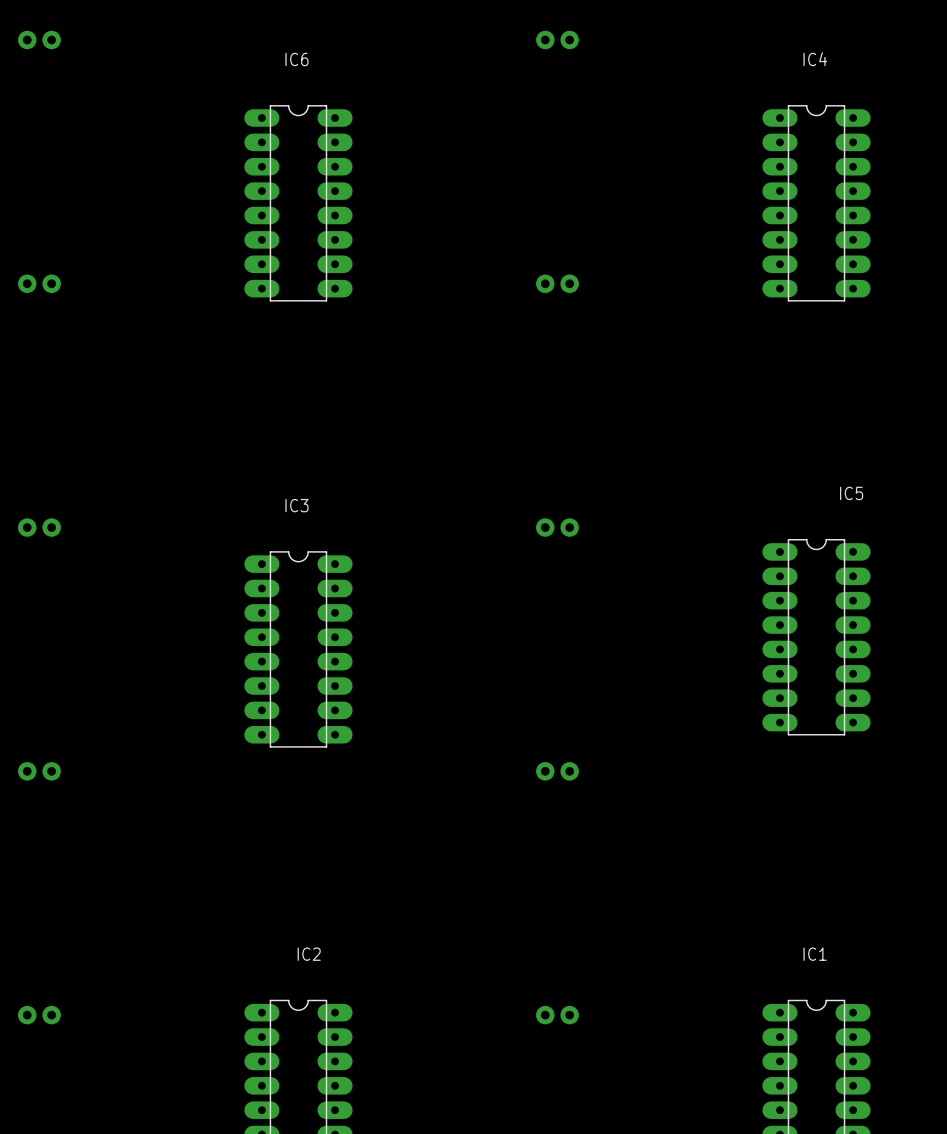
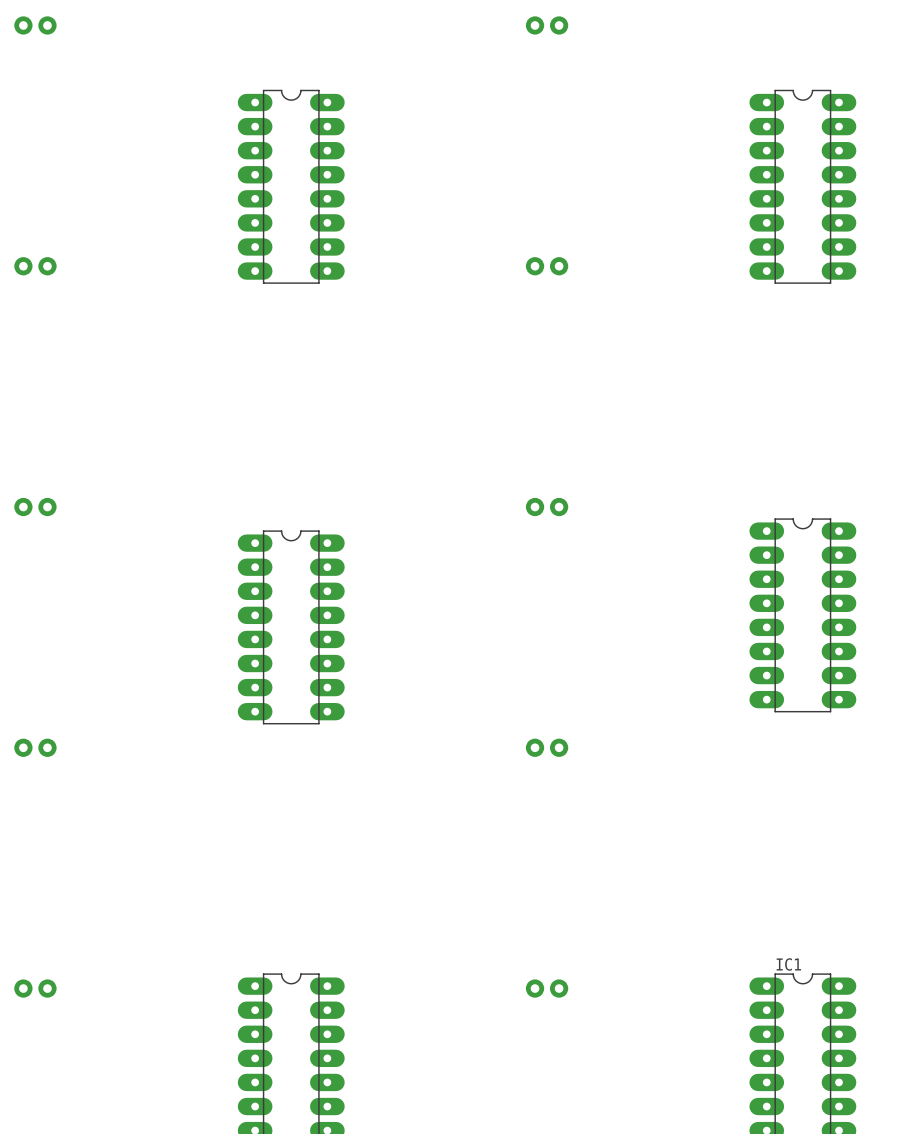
IC6 name: IC6 (296, 59) -> none
IC4 name: IC4 (815, 59) -> none
IC5 name: IC5 (851, 493) -> none
IC3 name: IC3 (296, 505) -> none
IC2 name: IC2 (309, 954) -> none
IC1 name position: IC1 (815, 954) -> IC1 (788, 964)

